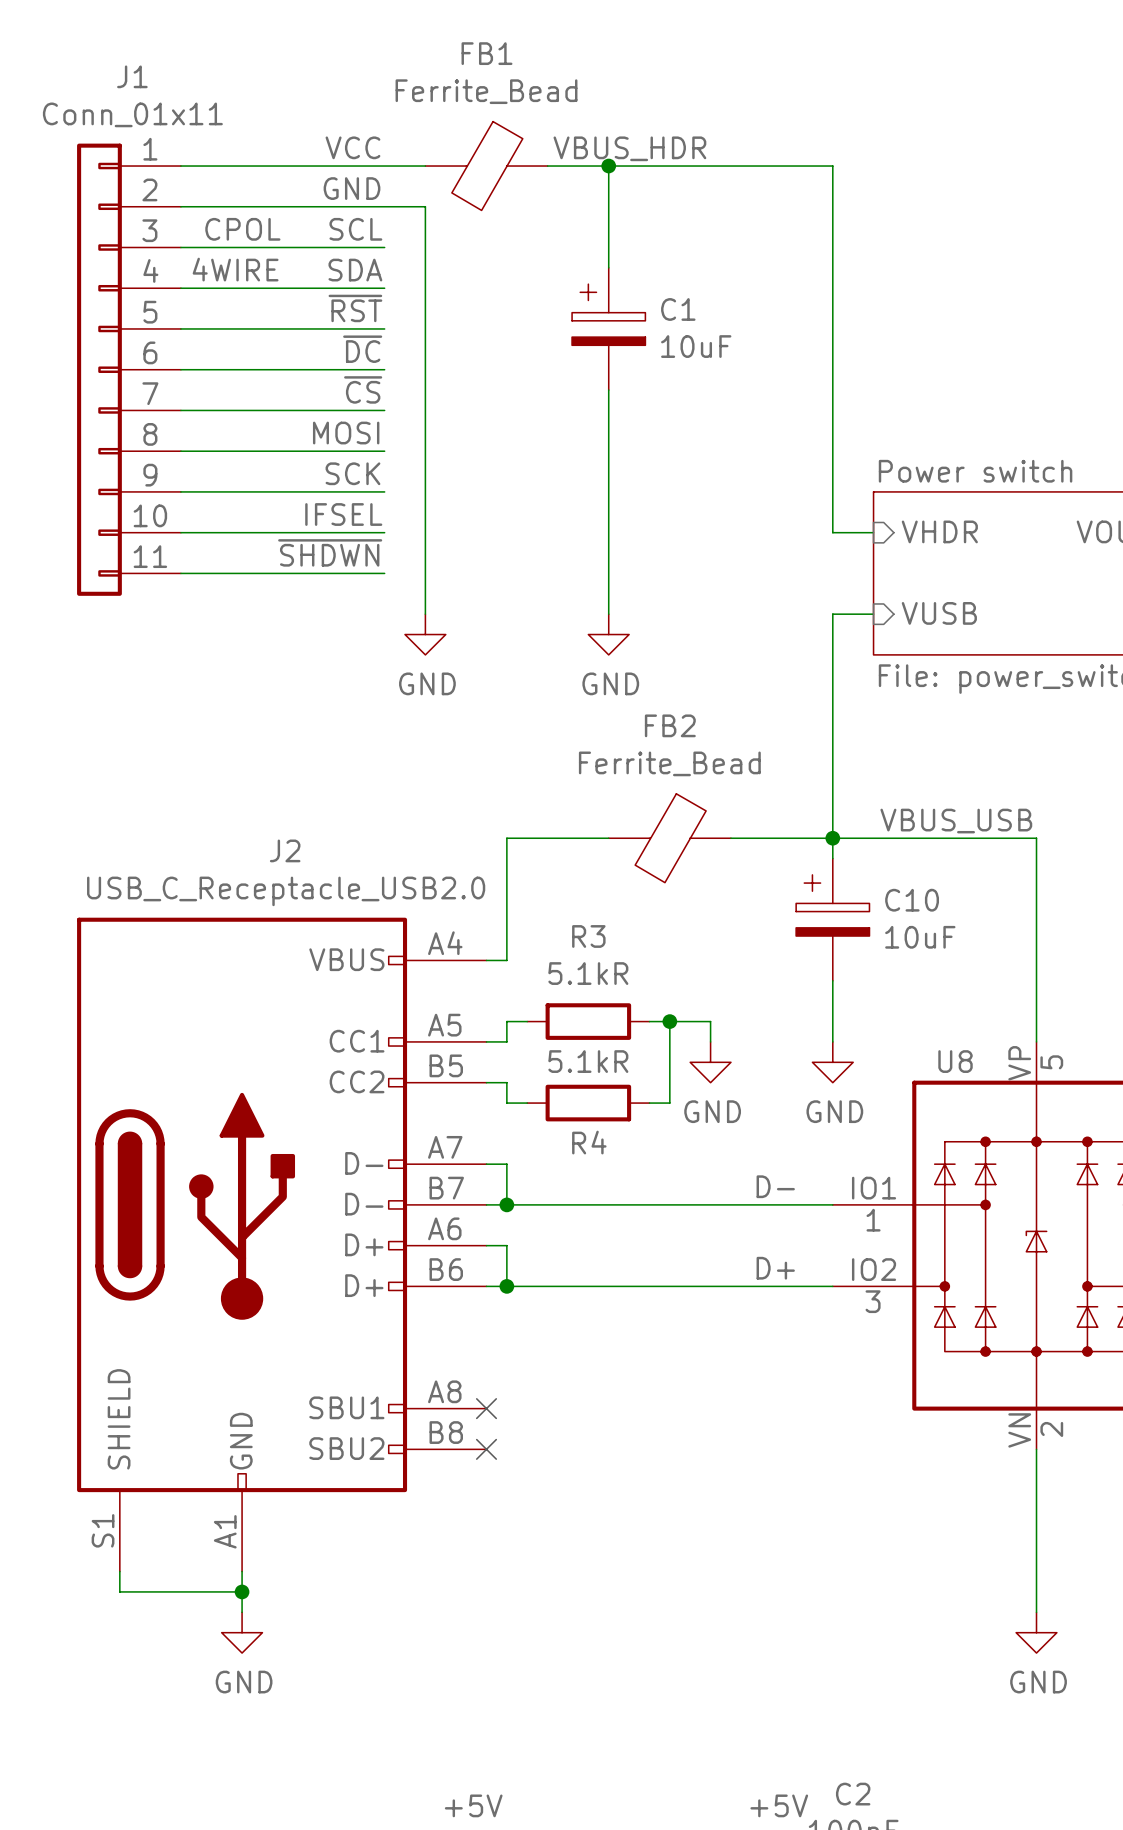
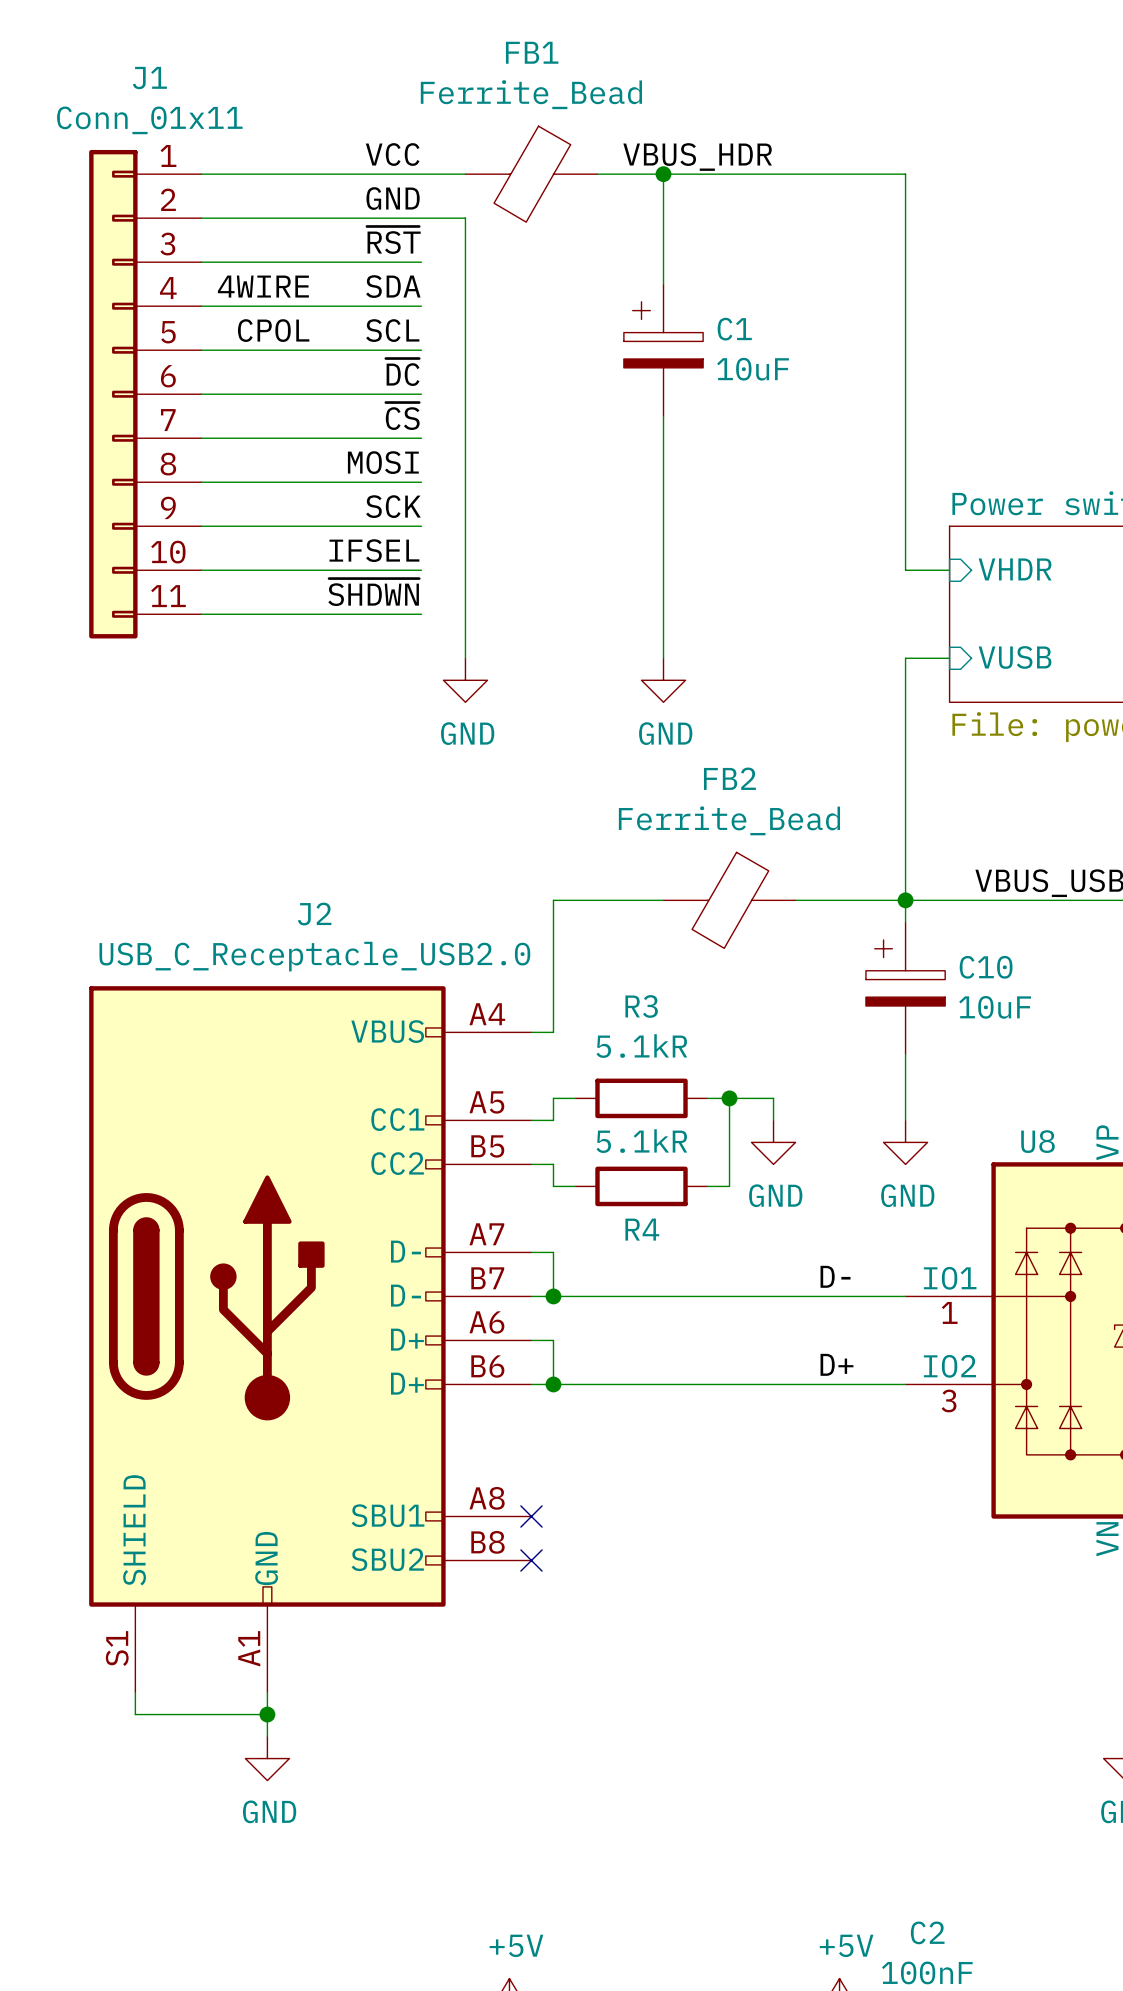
label position: CPOL (242, 229) -> CPOL (273, 330)
label: SCL (355, 229) -> ~{RST} (393, 240)
label: ~{RST} (355, 308) -> SCL (392, 330)

